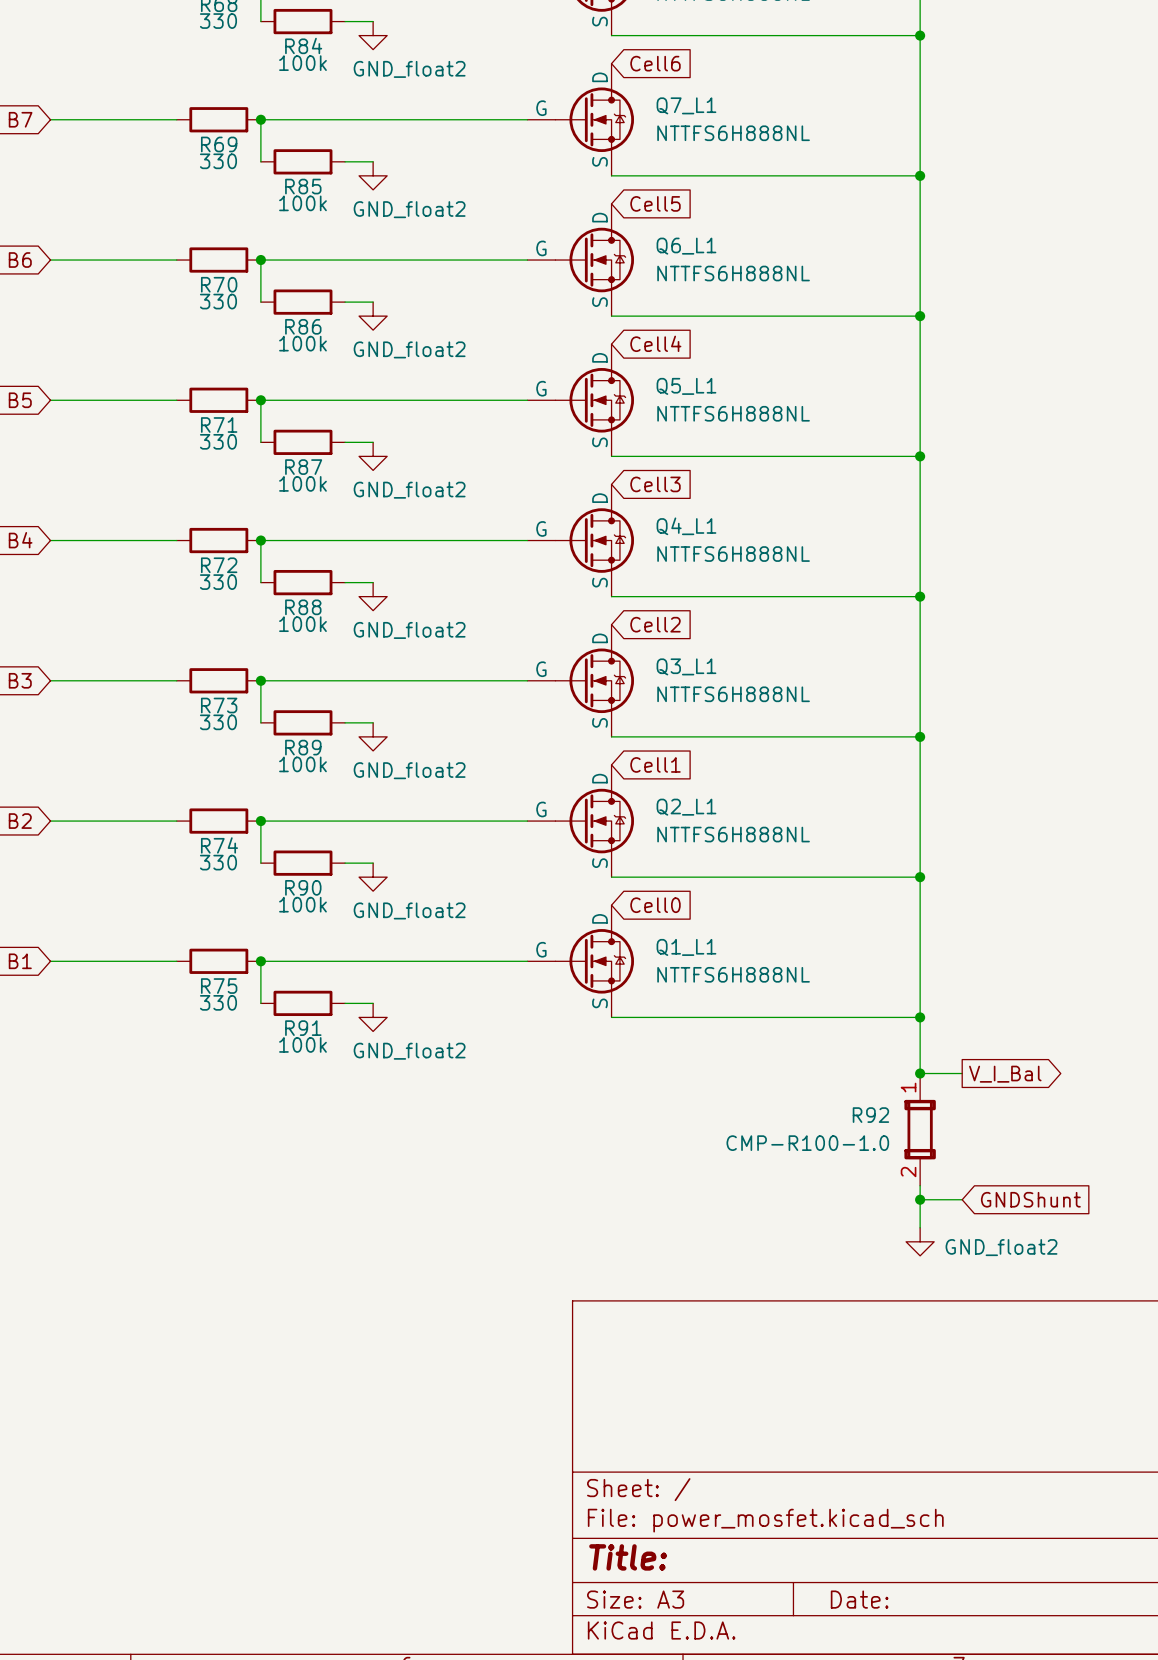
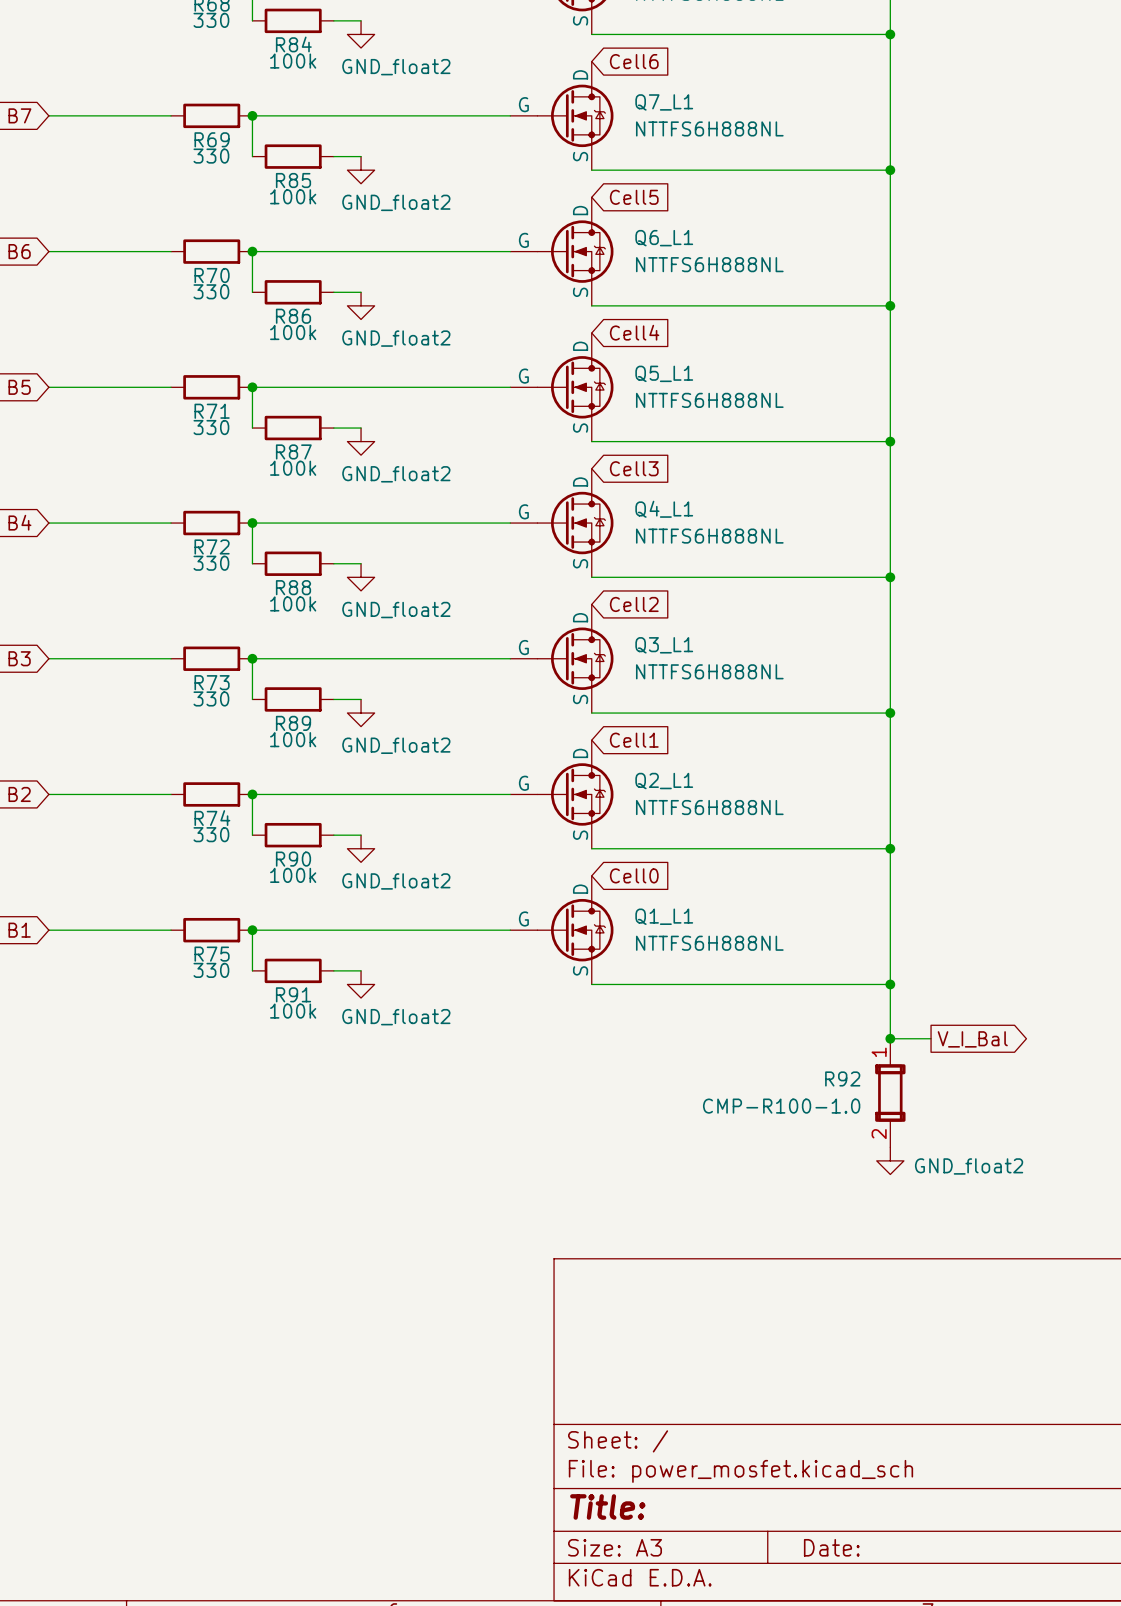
wire: (920, 1185) (920, 1227) -> none
wire: (920, 1199) (962, 1199) -> none
junction: (920, 1199) -> none
global label: GNDShunt (1030, 1199) -> none
power symbol position: GND_float2 (920, 1241) -> GND_float2 (890, 1160)

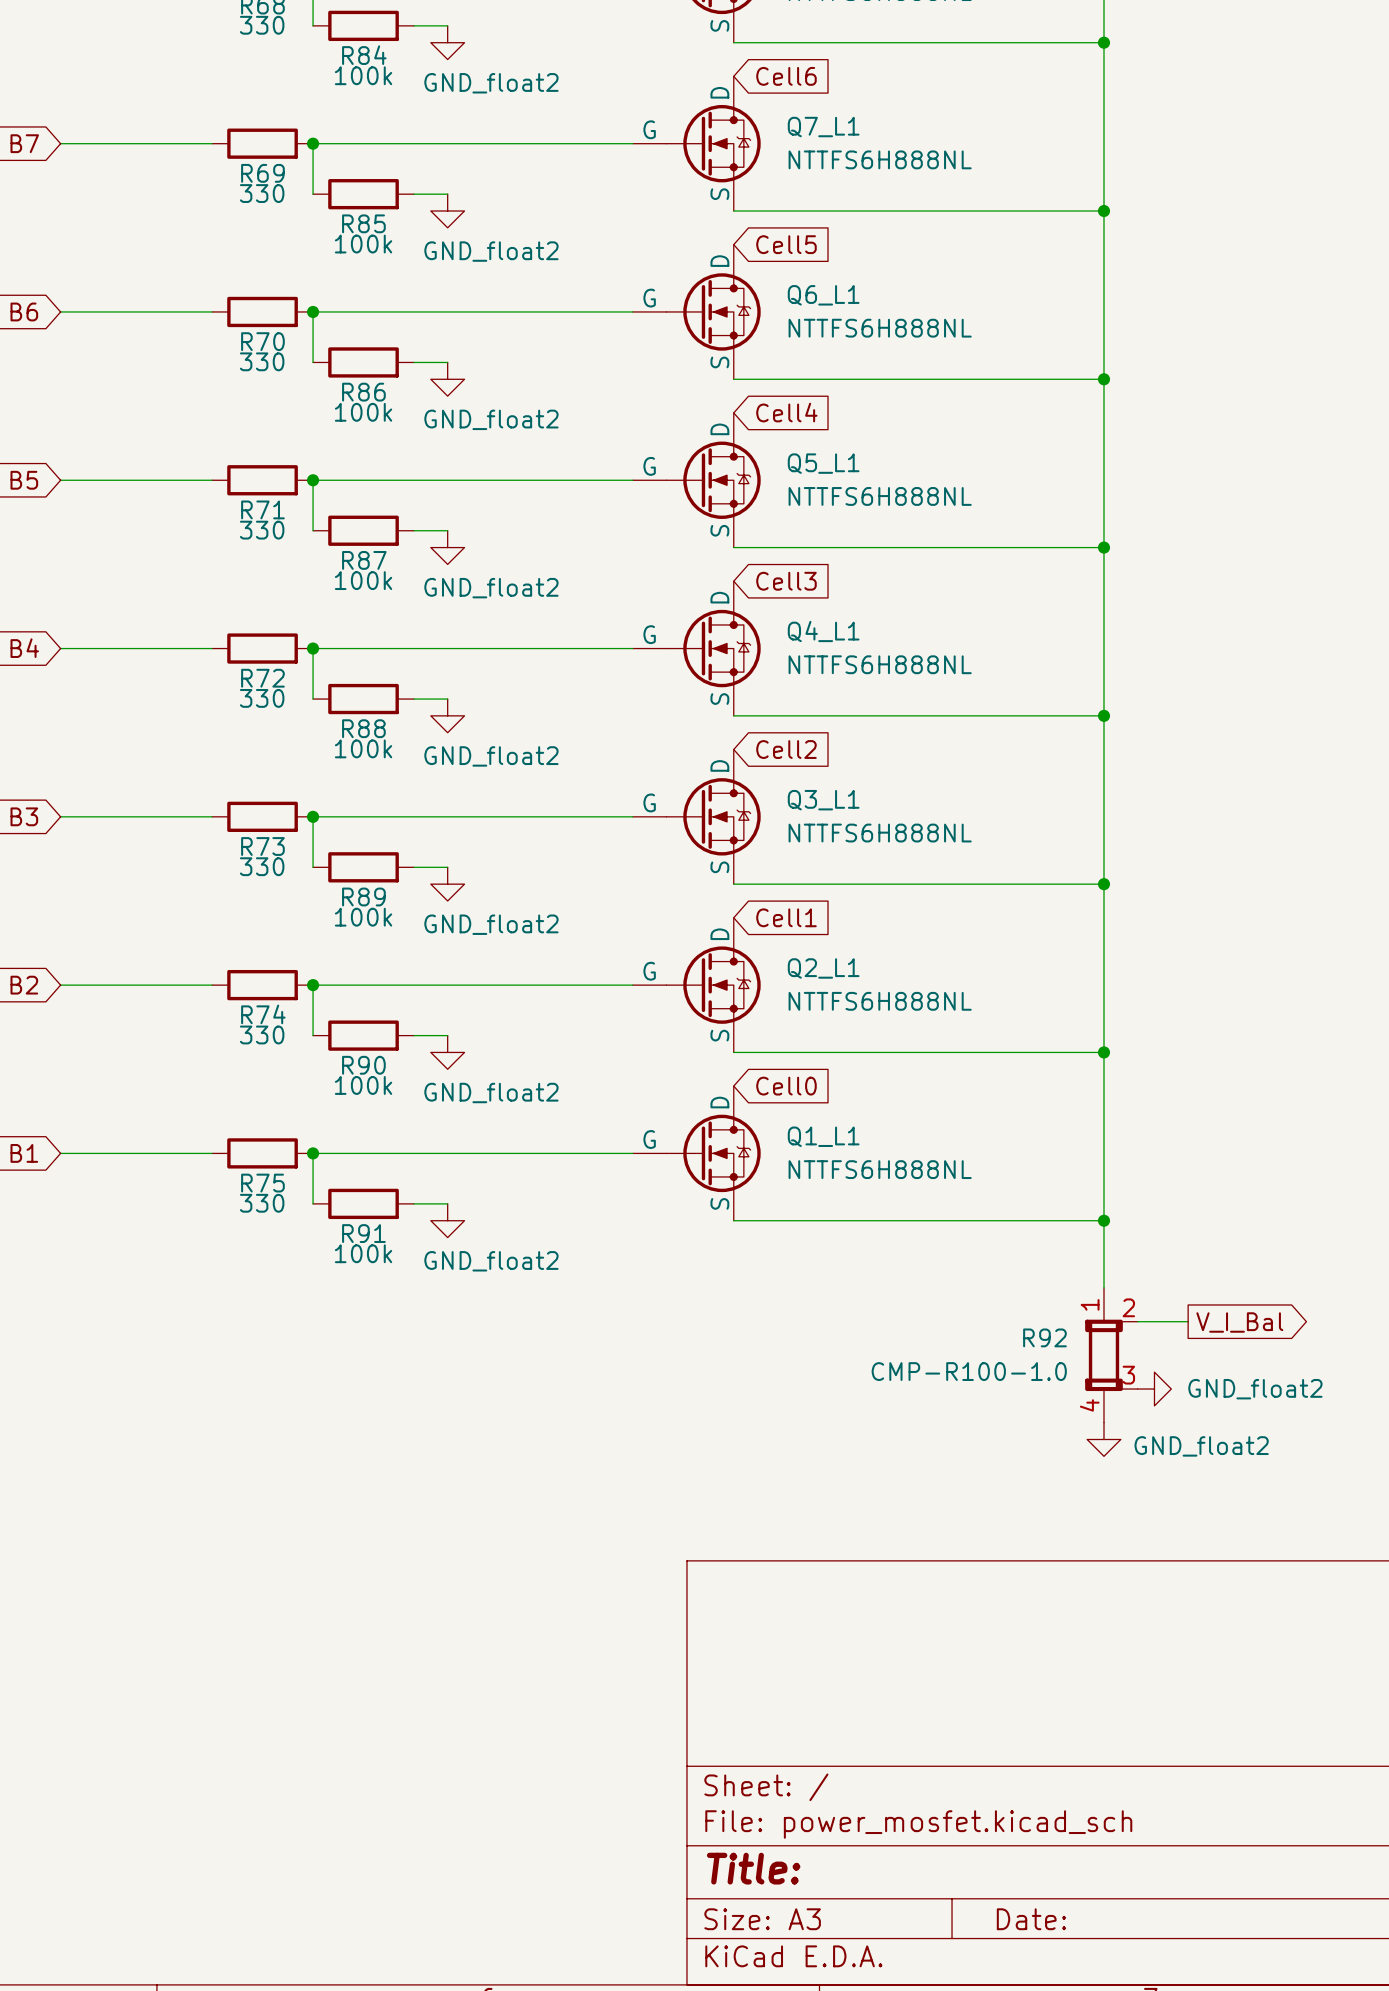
R92 symbol: [875, 1038, 906, 1148] -> [1085, 1288, 1138, 1423]
wire: (890, 1038) (931, 1038) -> (1137, 1321) (1188, 1321)
junction: (890, 1038) -> none
global label position: V_I_Bal (972, 1039) -> V_I_Bal (1239, 1322)
power symbol: none -> GND_float2 (1154, 1389)

